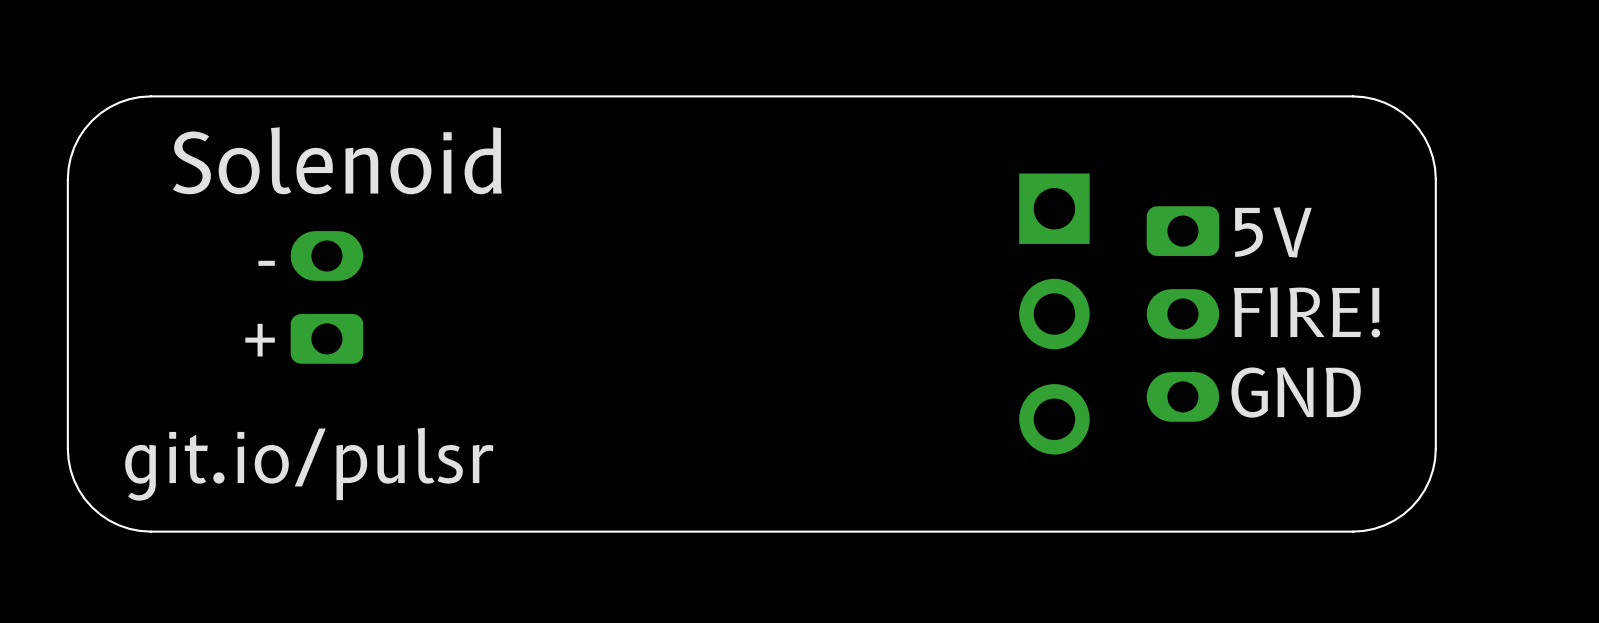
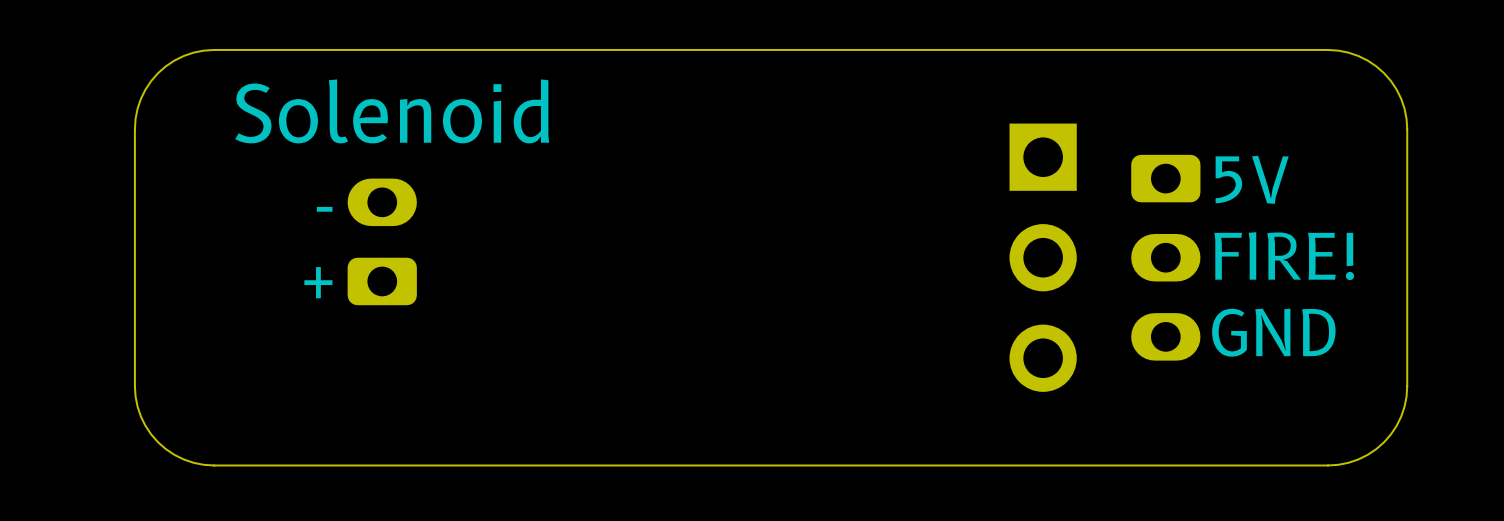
board edge: (185, 96) (150, 96) (129, 99) (100, 113) (84, 128) (74, 147) (67, 179) (67, 448) (70, 470) (84, 499) (109, 520) (139, 530) (185, 531) -> (214, 49) (183, 55) (158, 73) (140, 98) (134, 129) (134, 386) (137, 406) (145, 425) (165, 449) (183, 459) (214, 465)
text position: Solenoid (337, 160) -> Solenoid (392, 111)
text position: - (266, 263) -> - (324, 209)
part position: (326, 297) -> (382, 241)
text position: + (260, 340) -> + (318, 282)
text: git.io/pulsr (309, 464) -> none

